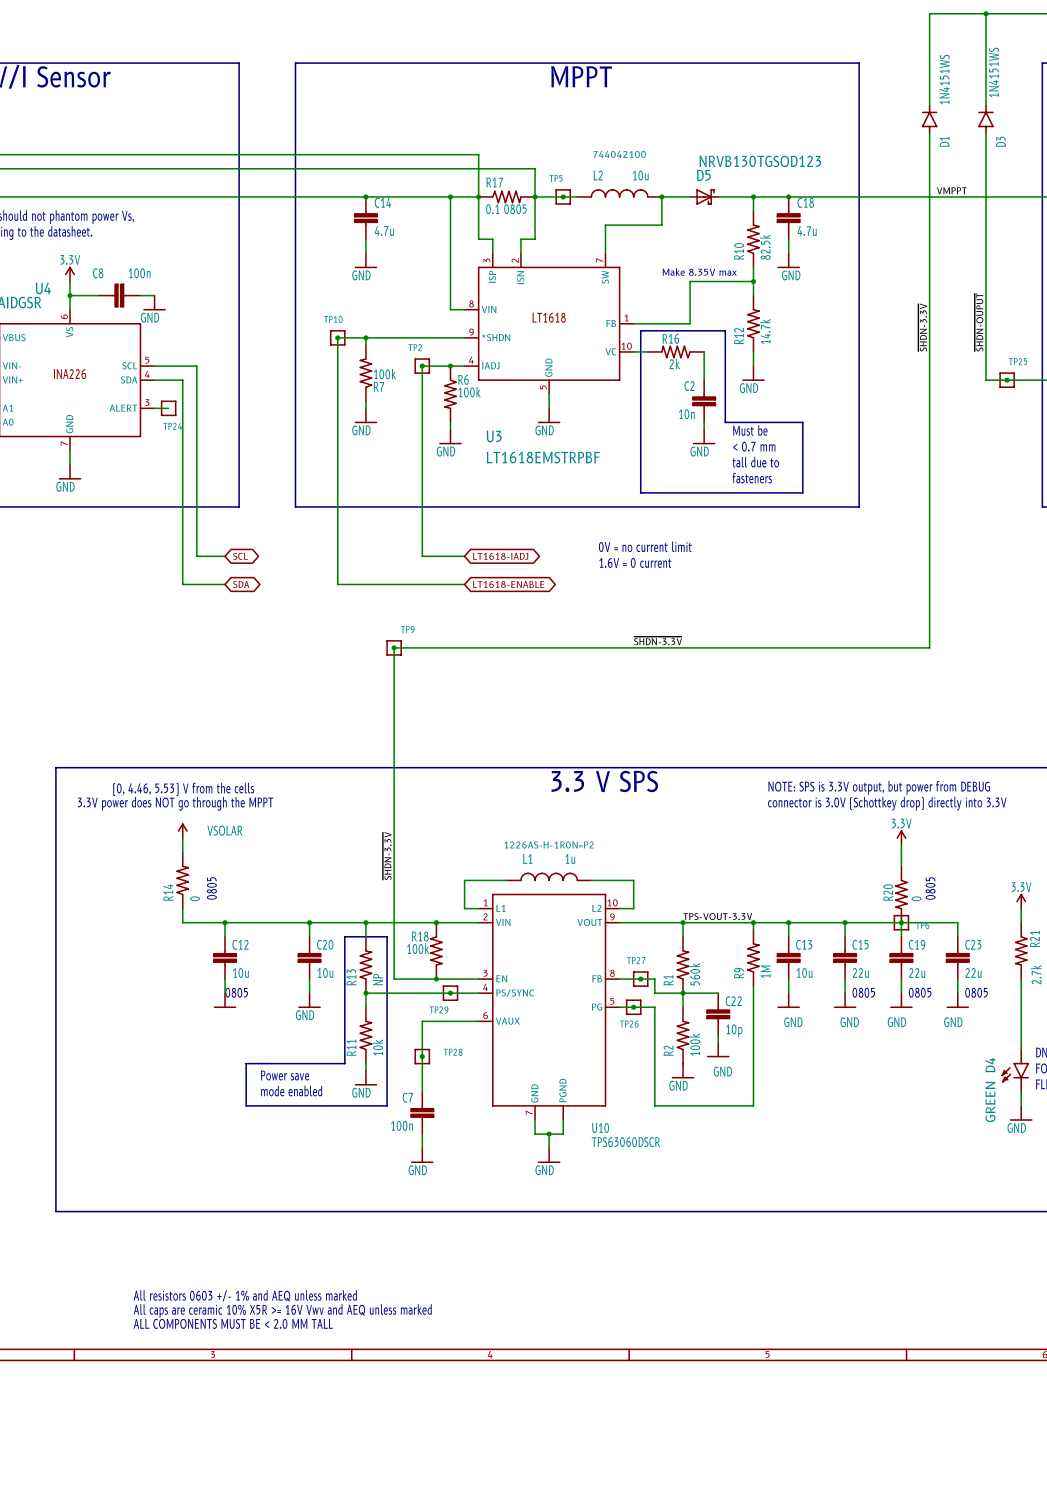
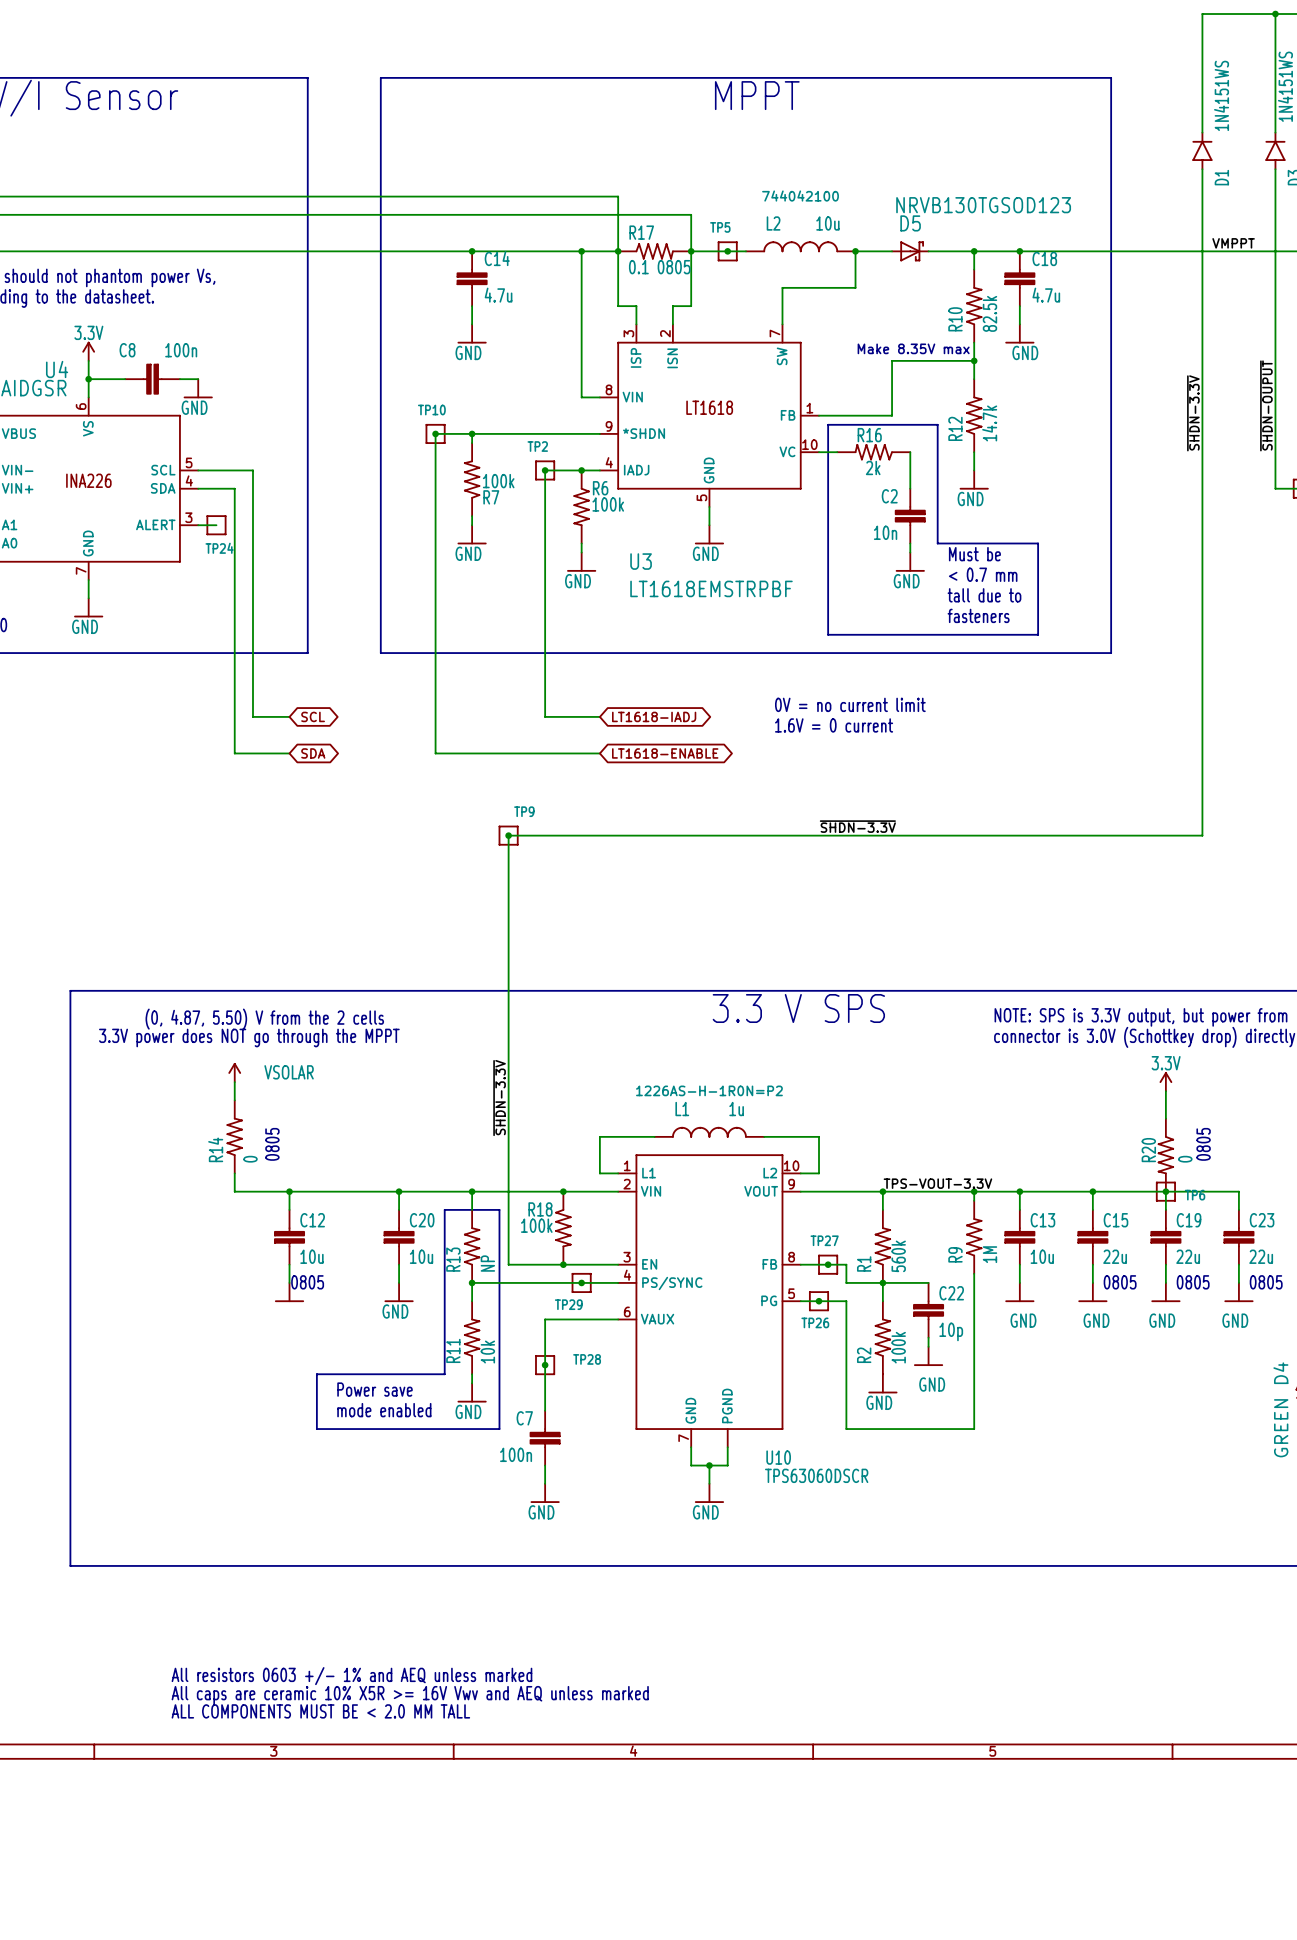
text: (0, 4.46, 5.53) V from the cells (183, 789) -> (0, 4.87, 5.50) V from the 2 cells (264, 1019)

